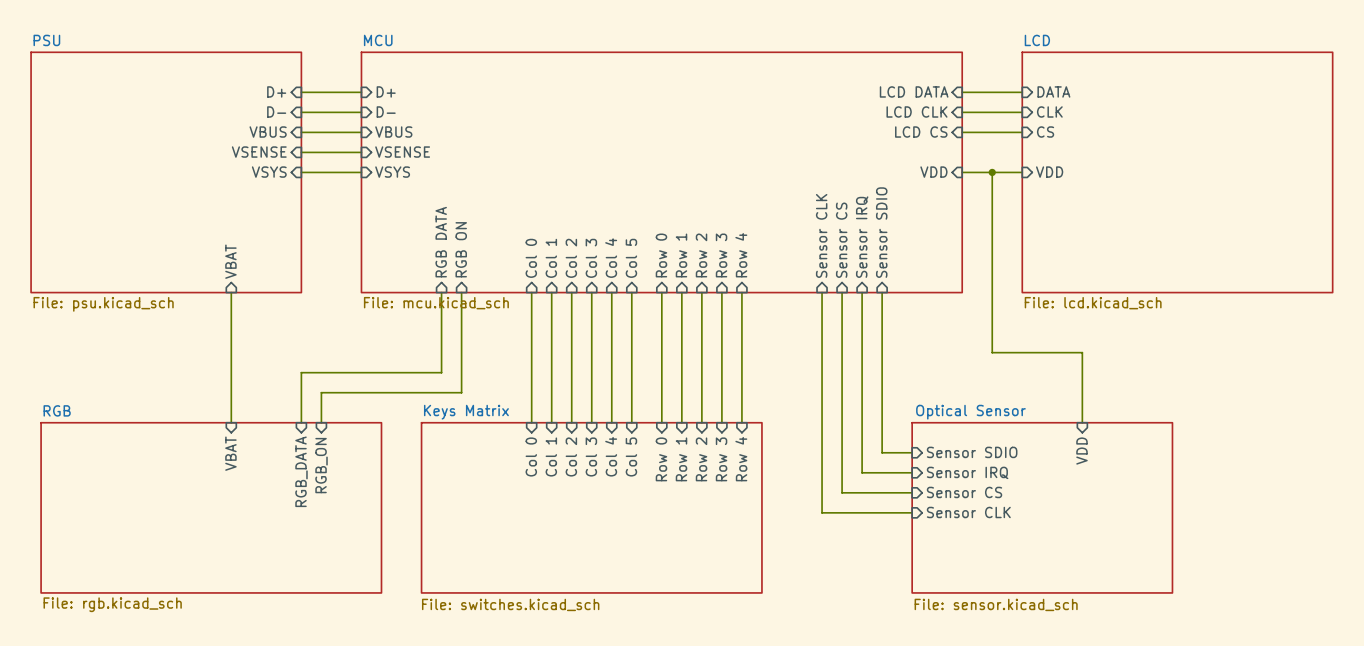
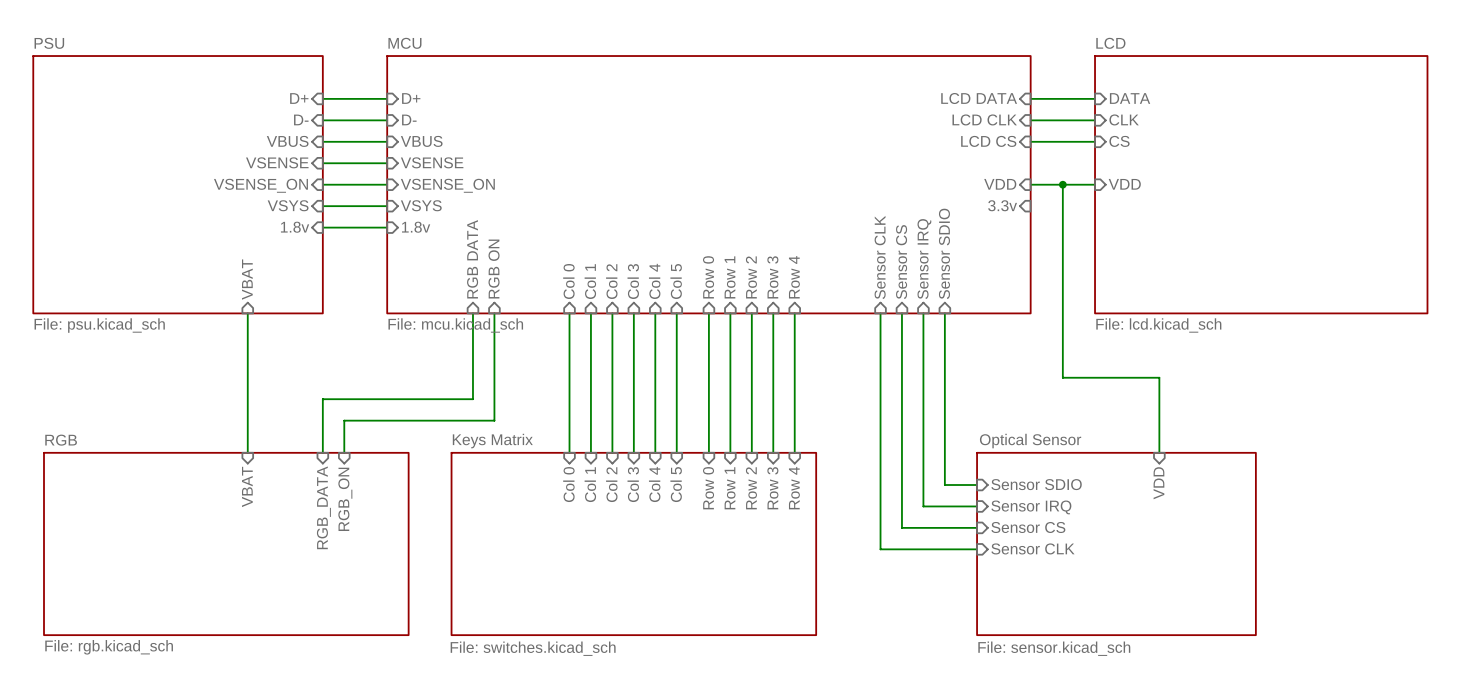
sheet pin: VSYS (269, 172) -> VSENSE_ON (260, 185)
sheet pin: VSYS (392, 172) -> VSENSE_ON (447, 185)
sheet pin: none -> VSYS (288, 205)
wire: none -> (322, 206) (387, 206)
sheet pin: none -> VSYS (421, 205)
sheet pin: none -> 3.3v (1002, 205)
sheet pin: none -> 1.8v (295, 227)
wire: none -> (322, 227) (387, 227)
sheet pin: none -> 1.8v (416, 227)

